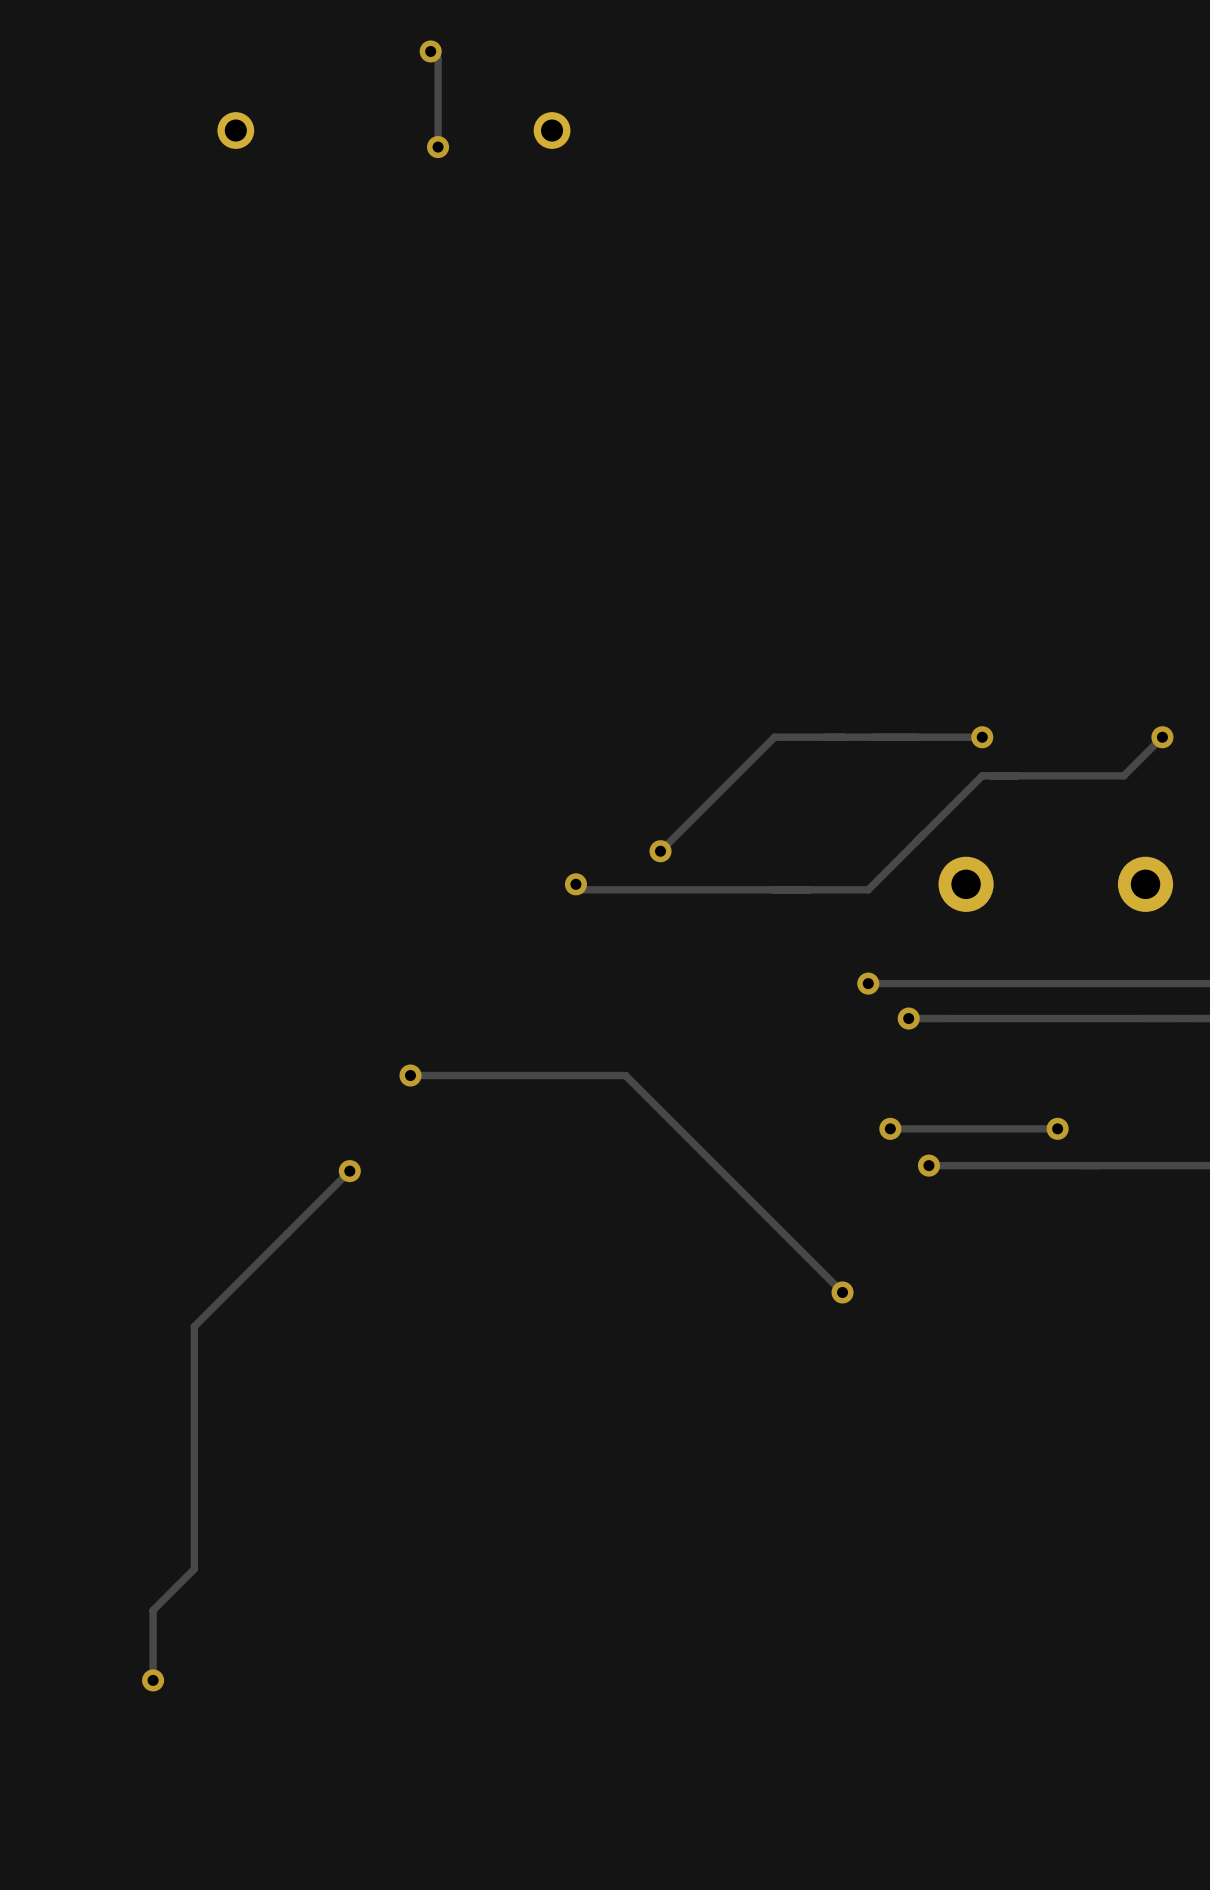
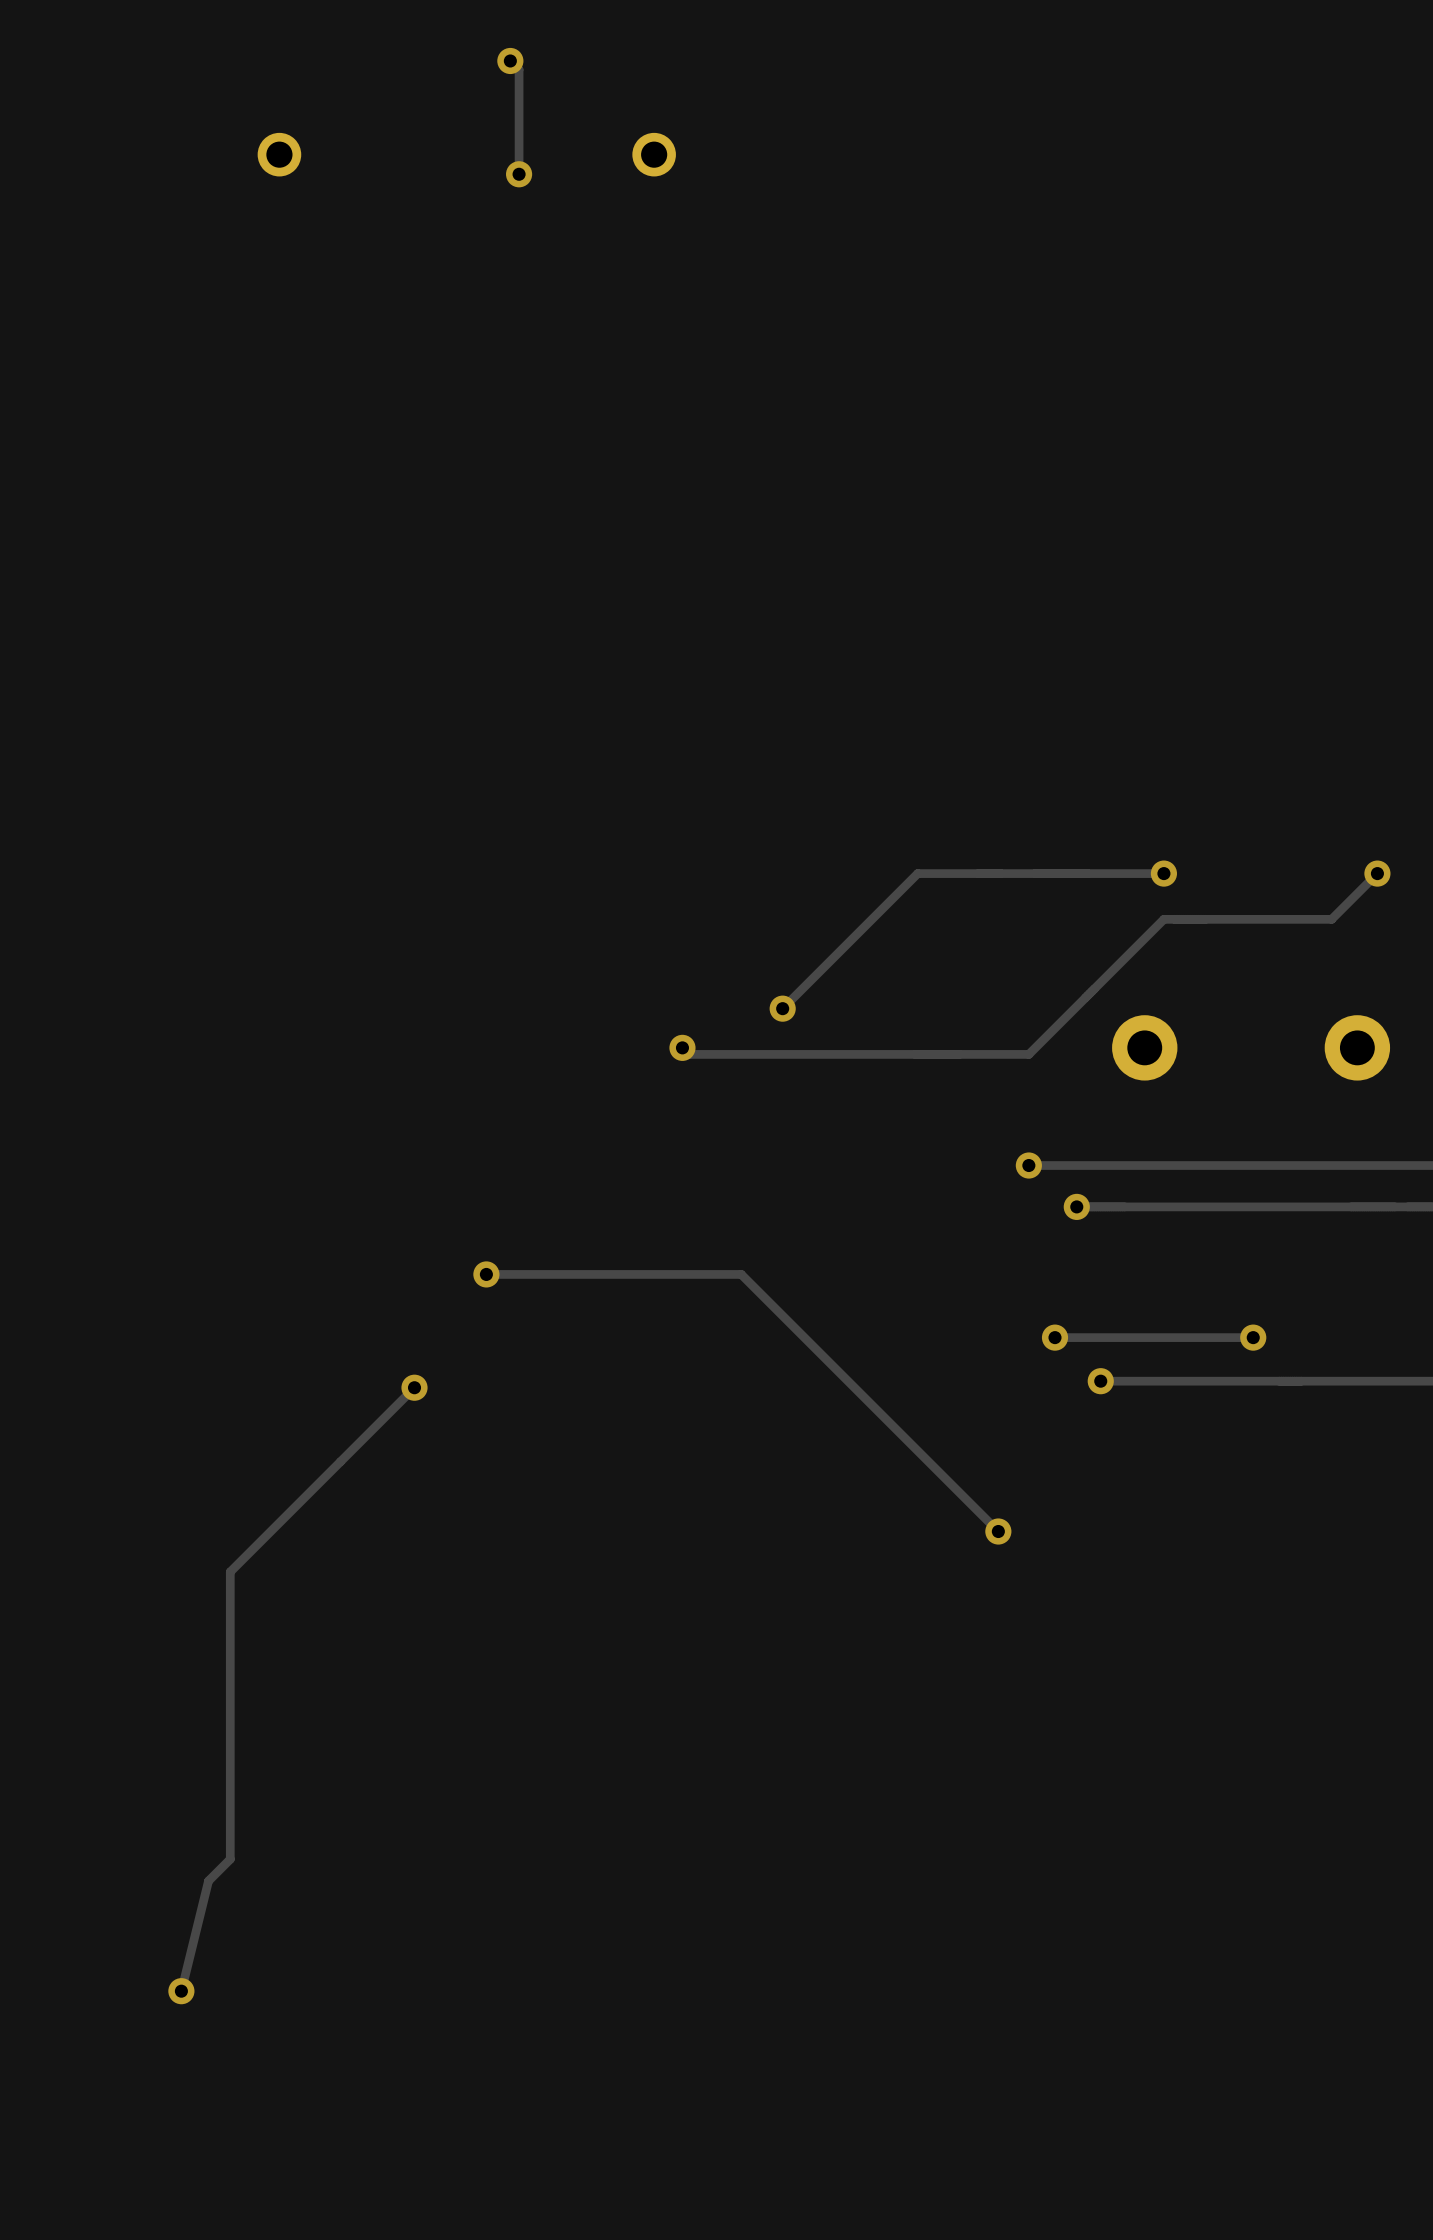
track: (175, 1587) (153, 1610) (153, 1680) -> (208, 1881) (181, 1991)

